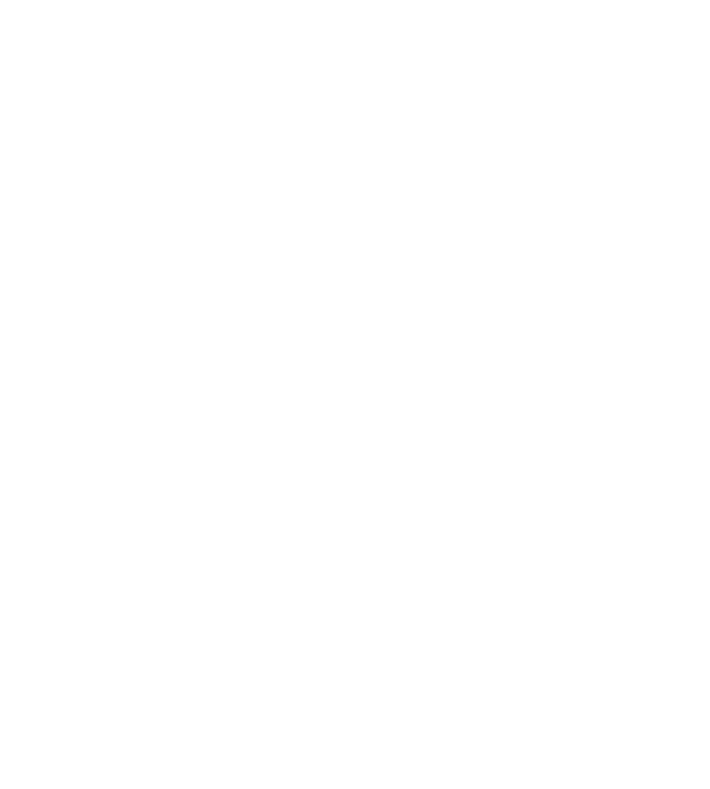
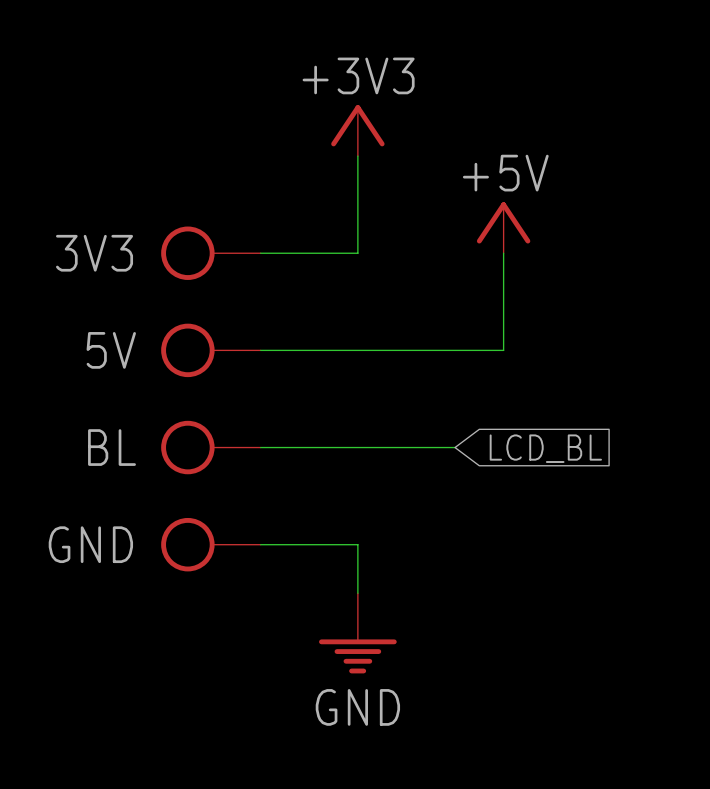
power symbol: none -> +3V3 (357, 130)
wire: none -> (357, 156) (357, 253) (260, 253)
power symbol: none -> +5V (503, 227)
3V3: none -> (210, 253)
wire: none -> (503, 253) (503, 350) (260, 350)
5V: none -> (210, 350)
BL: none -> (210, 447)
wire: none -> (260, 447) (455, 447)
global label: none -> LCD_BL (545, 448)
GND: none -> (210, 544)
wire: none -> (260, 544) (357, 544) (357, 593)
power symbol: none -> GND (357, 633)

